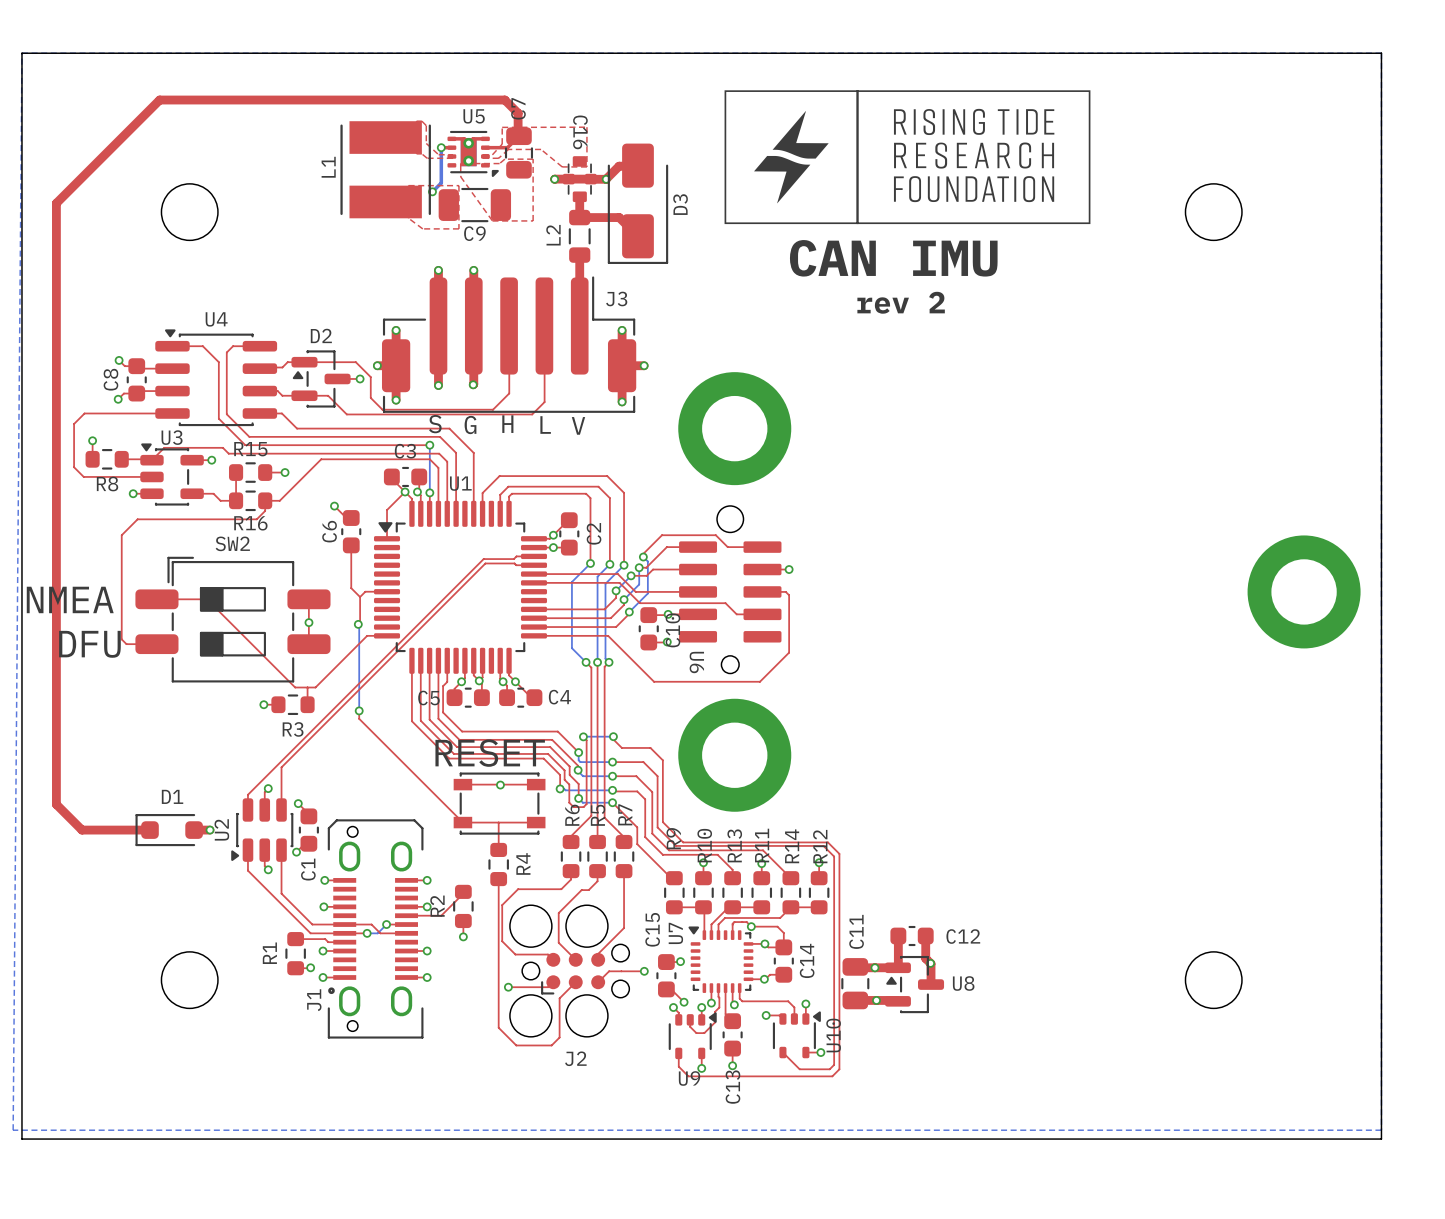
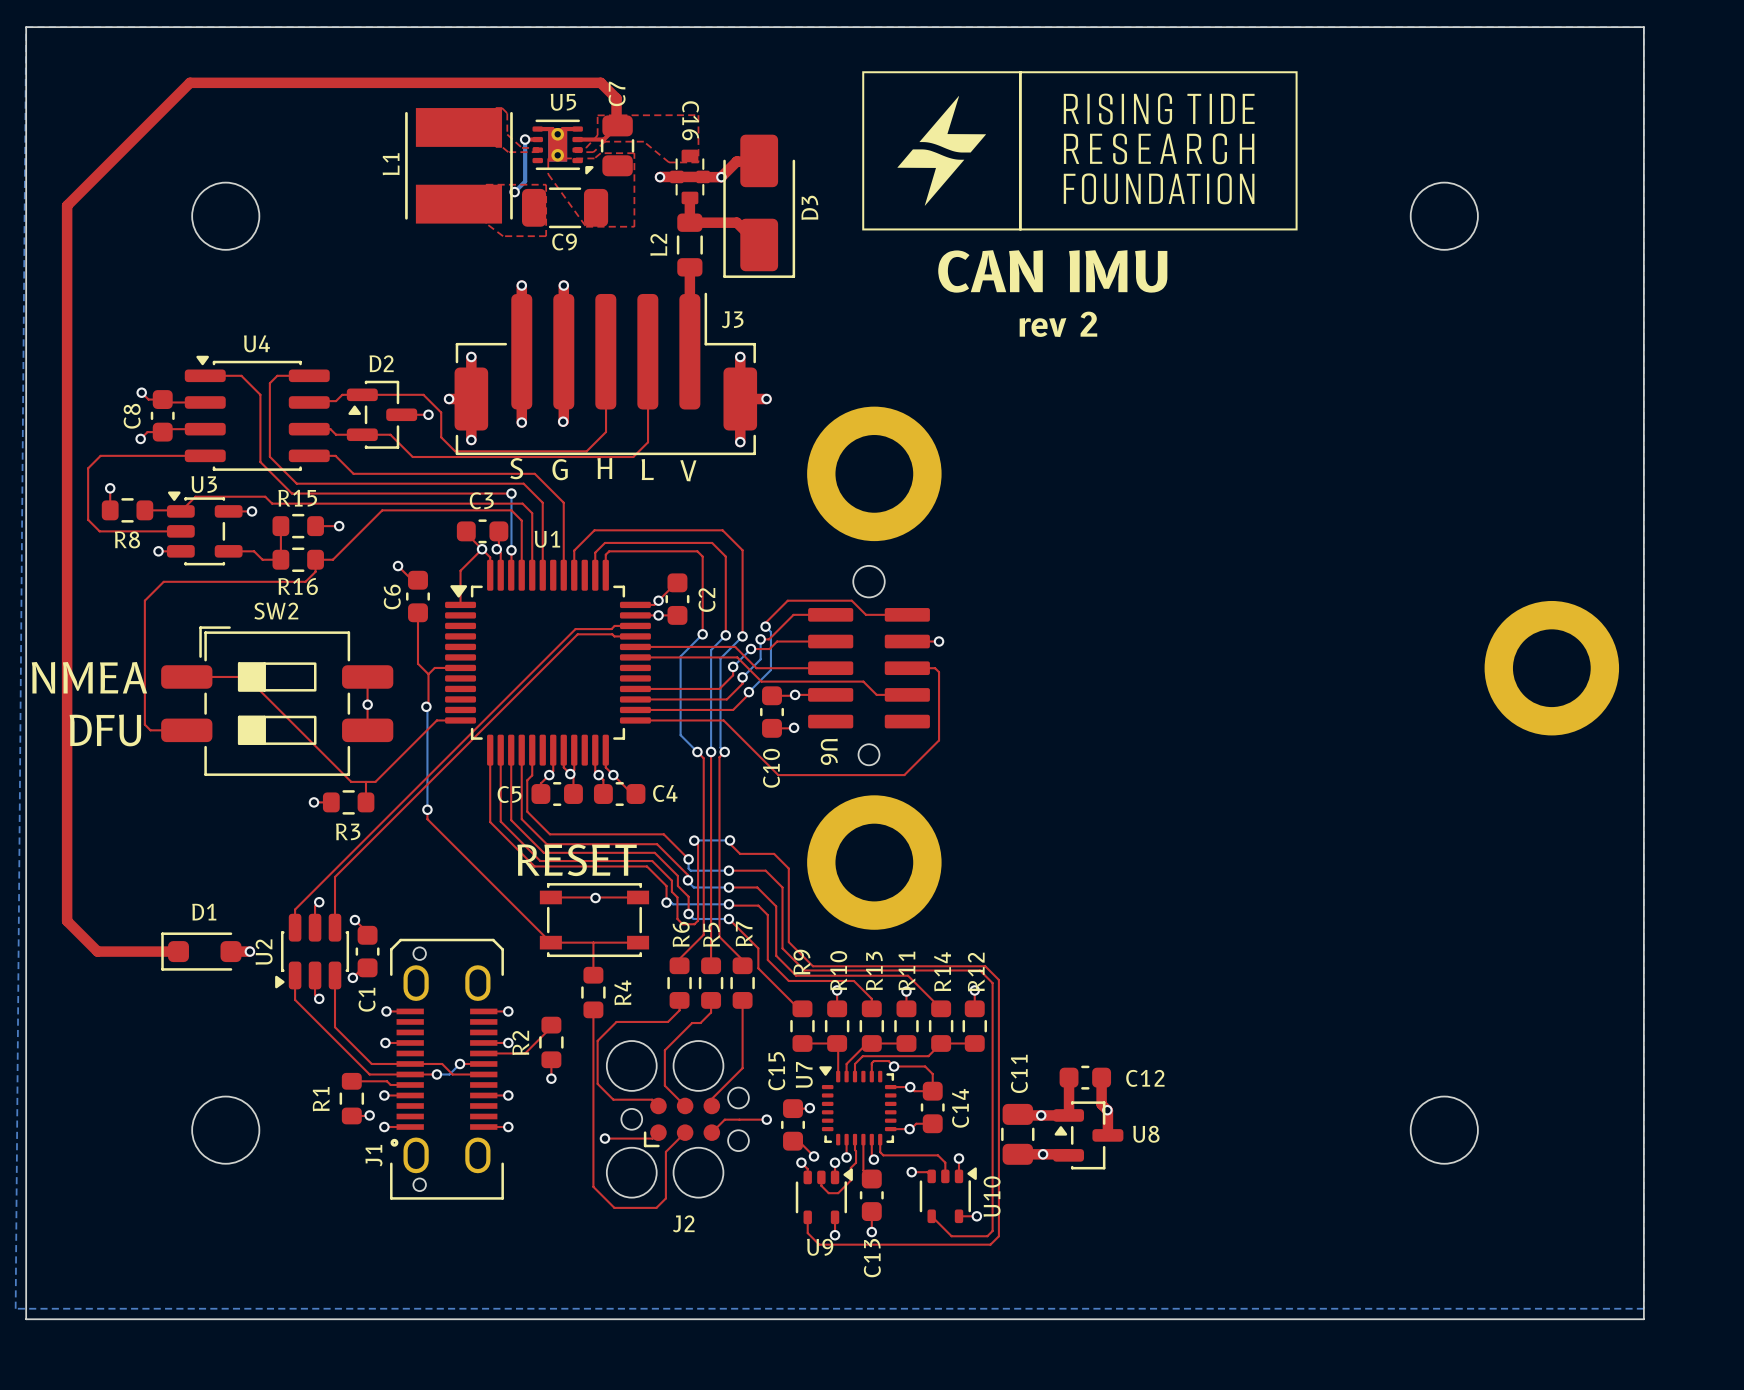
C10 name position: C10 (672, 630) -> C10 (771, 768)

